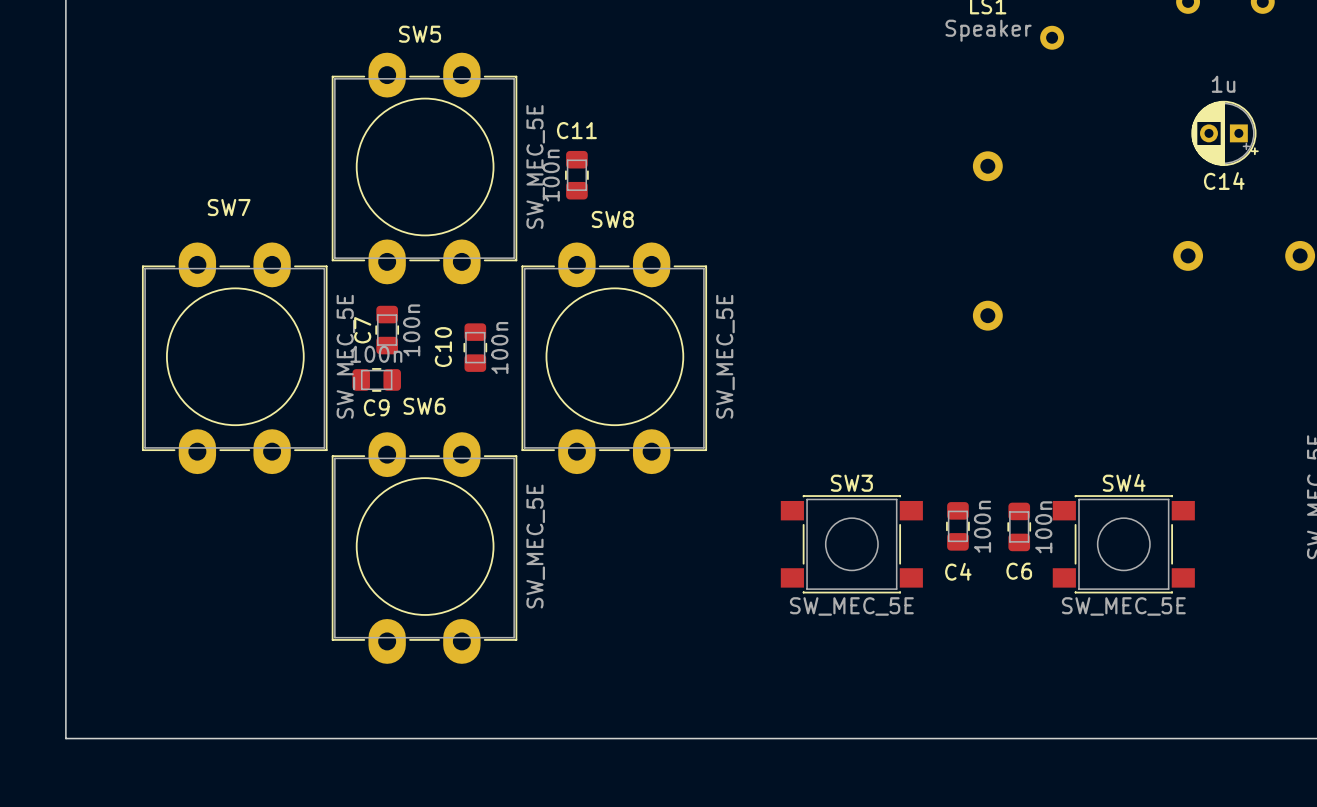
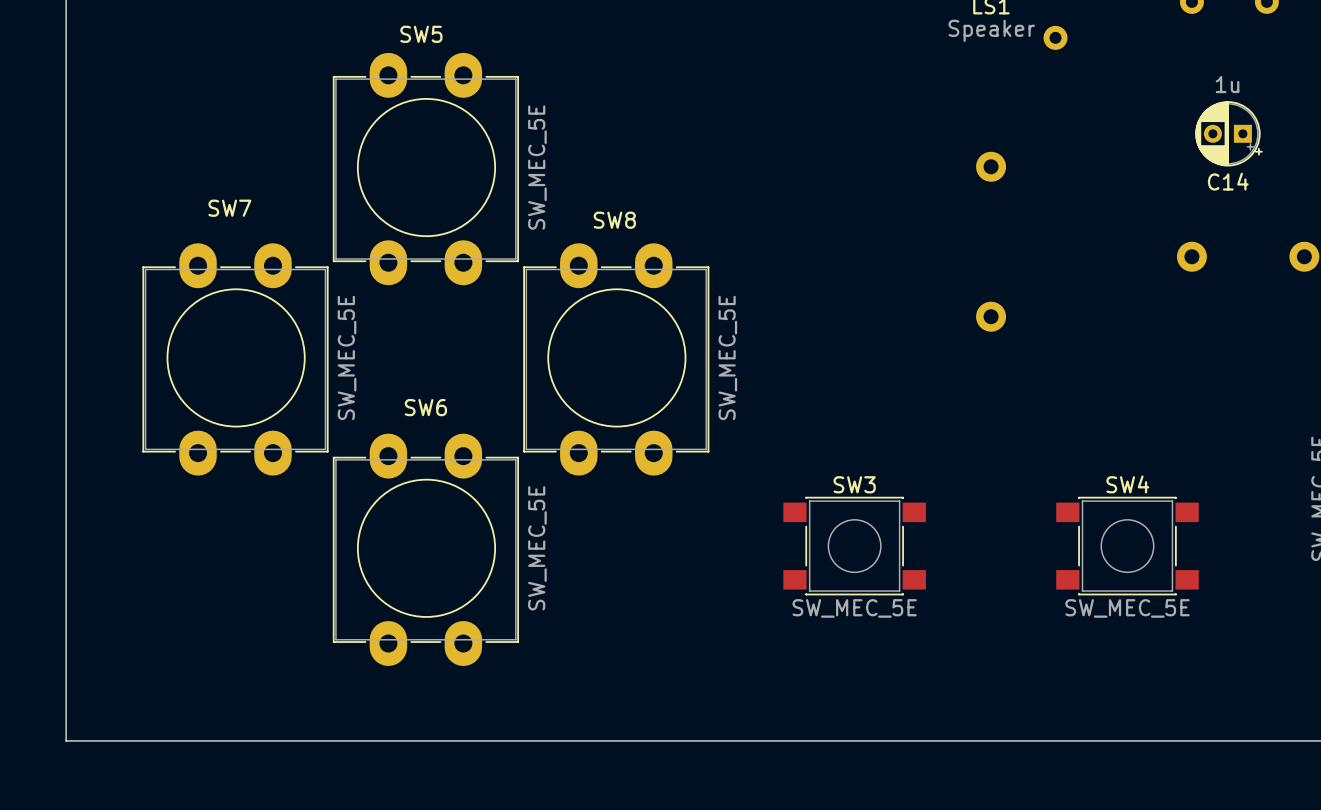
C11: 100n (576, 175) -> none
C7: 100n (387, 330) -> none
C10: 100n (475, 347) -> none
C9: 100n (376, 379) -> none
C4: 100n (957, 526) -> none
C6: 100n (1019, 526) -> none

